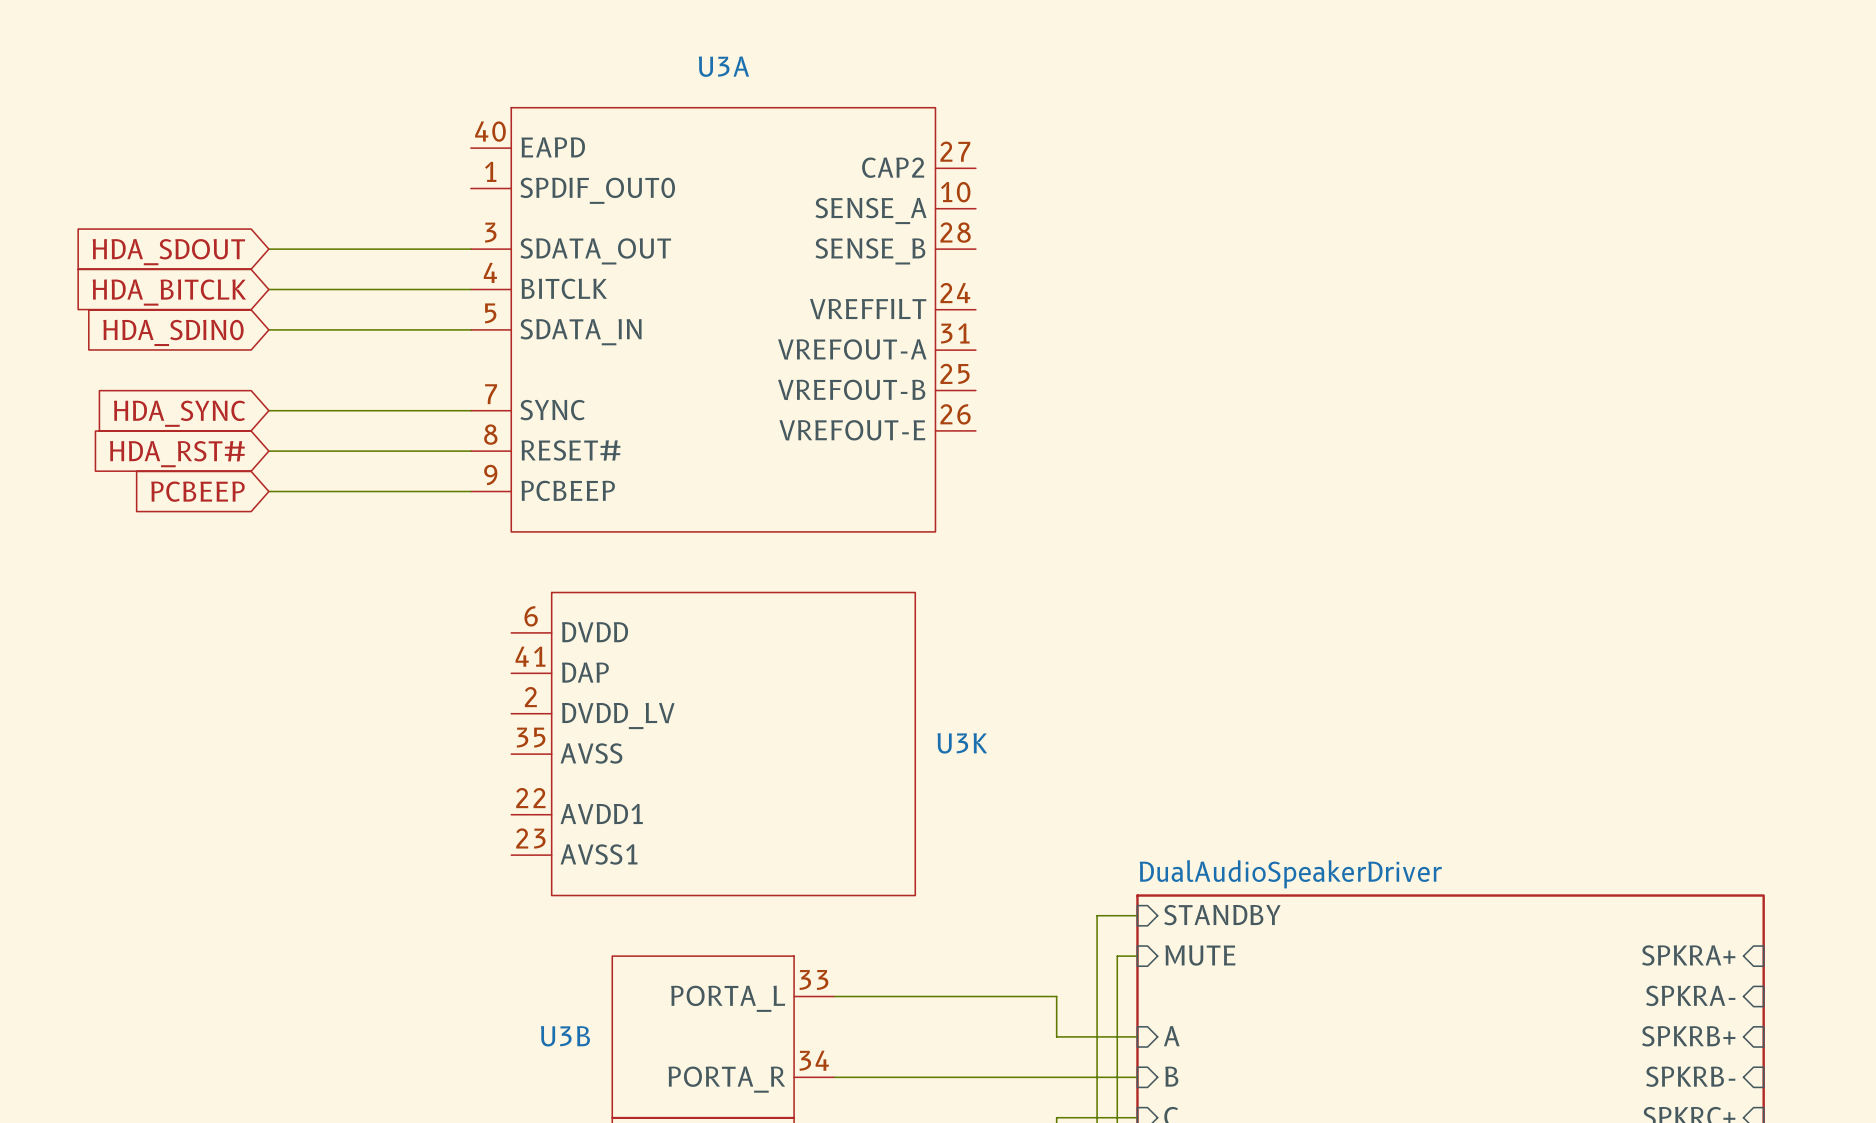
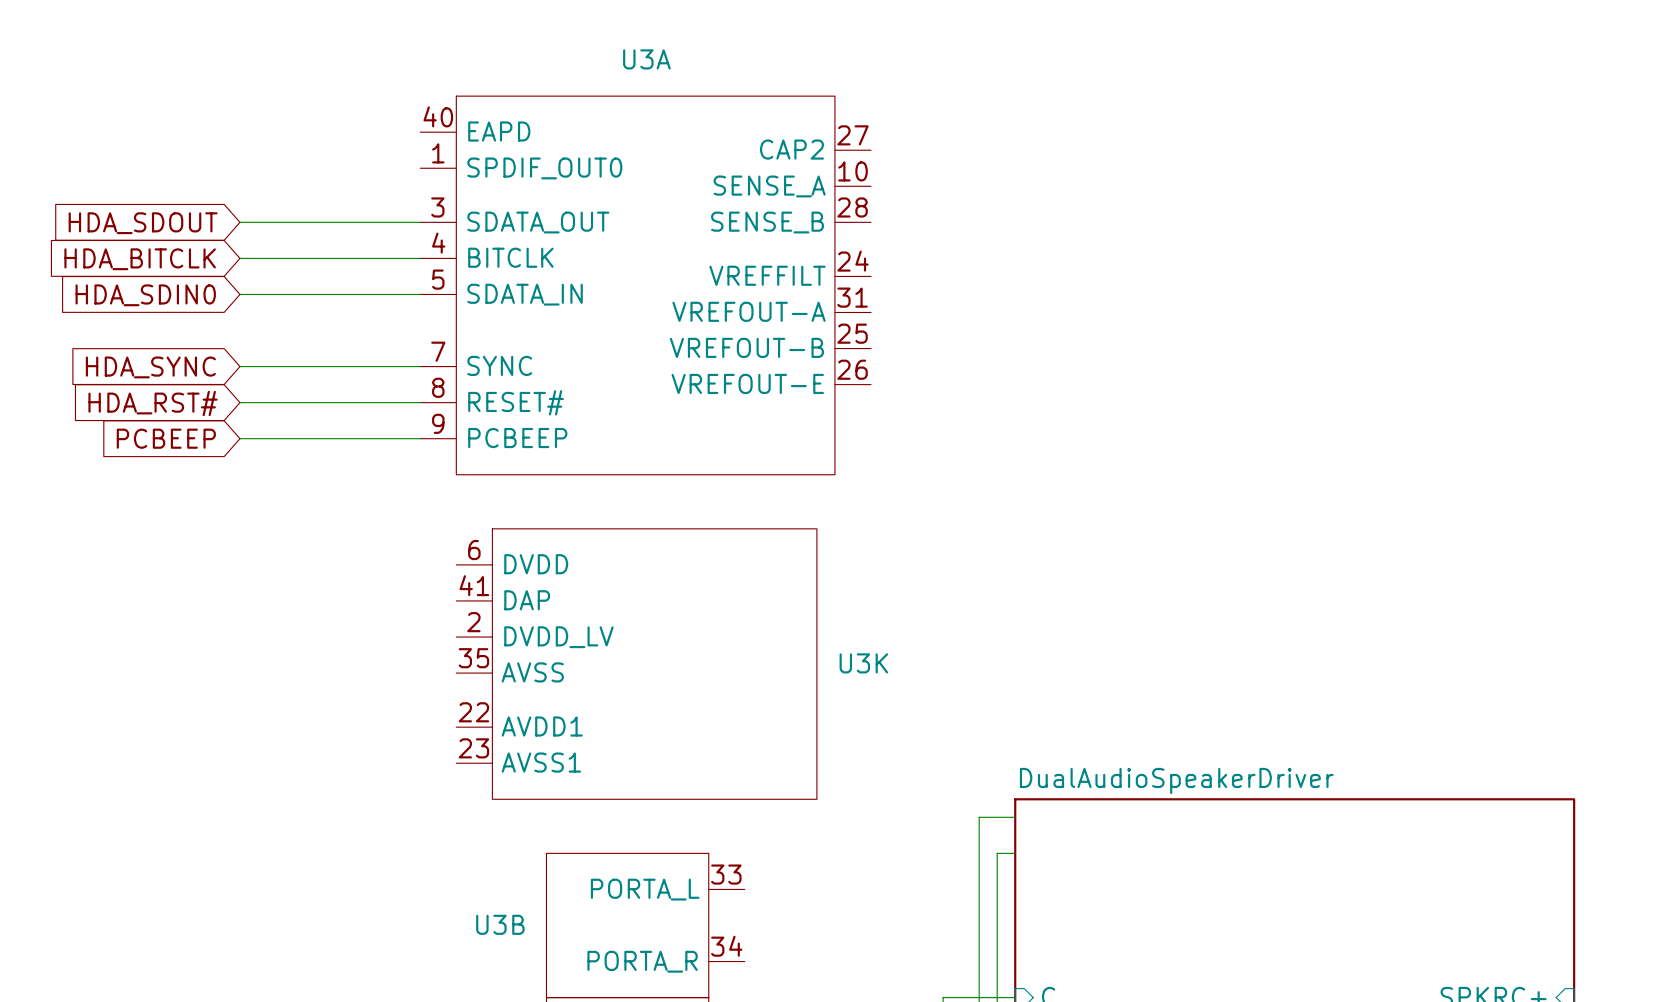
sheet pin: STANDBY (1222, 915) -> none
sheet pin: MUTE (1200, 955) -> none
sheet pin: SPKRA+ (1688, 955) -> none
sheet pin: SPKRA- (1690, 995) -> none
wire: (834, 996) (1056, 996) (1056, 1036) (1137, 1036) -> none
sheet pin: A (1171, 1036) -> none
sheet pin: SPKRB+ (1688, 1036) -> none
sheet pin: B (1171, 1076) -> none
sheet pin: SPKRB- (1690, 1076) -> none
wire: (834, 1077) (1137, 1077) -> none

